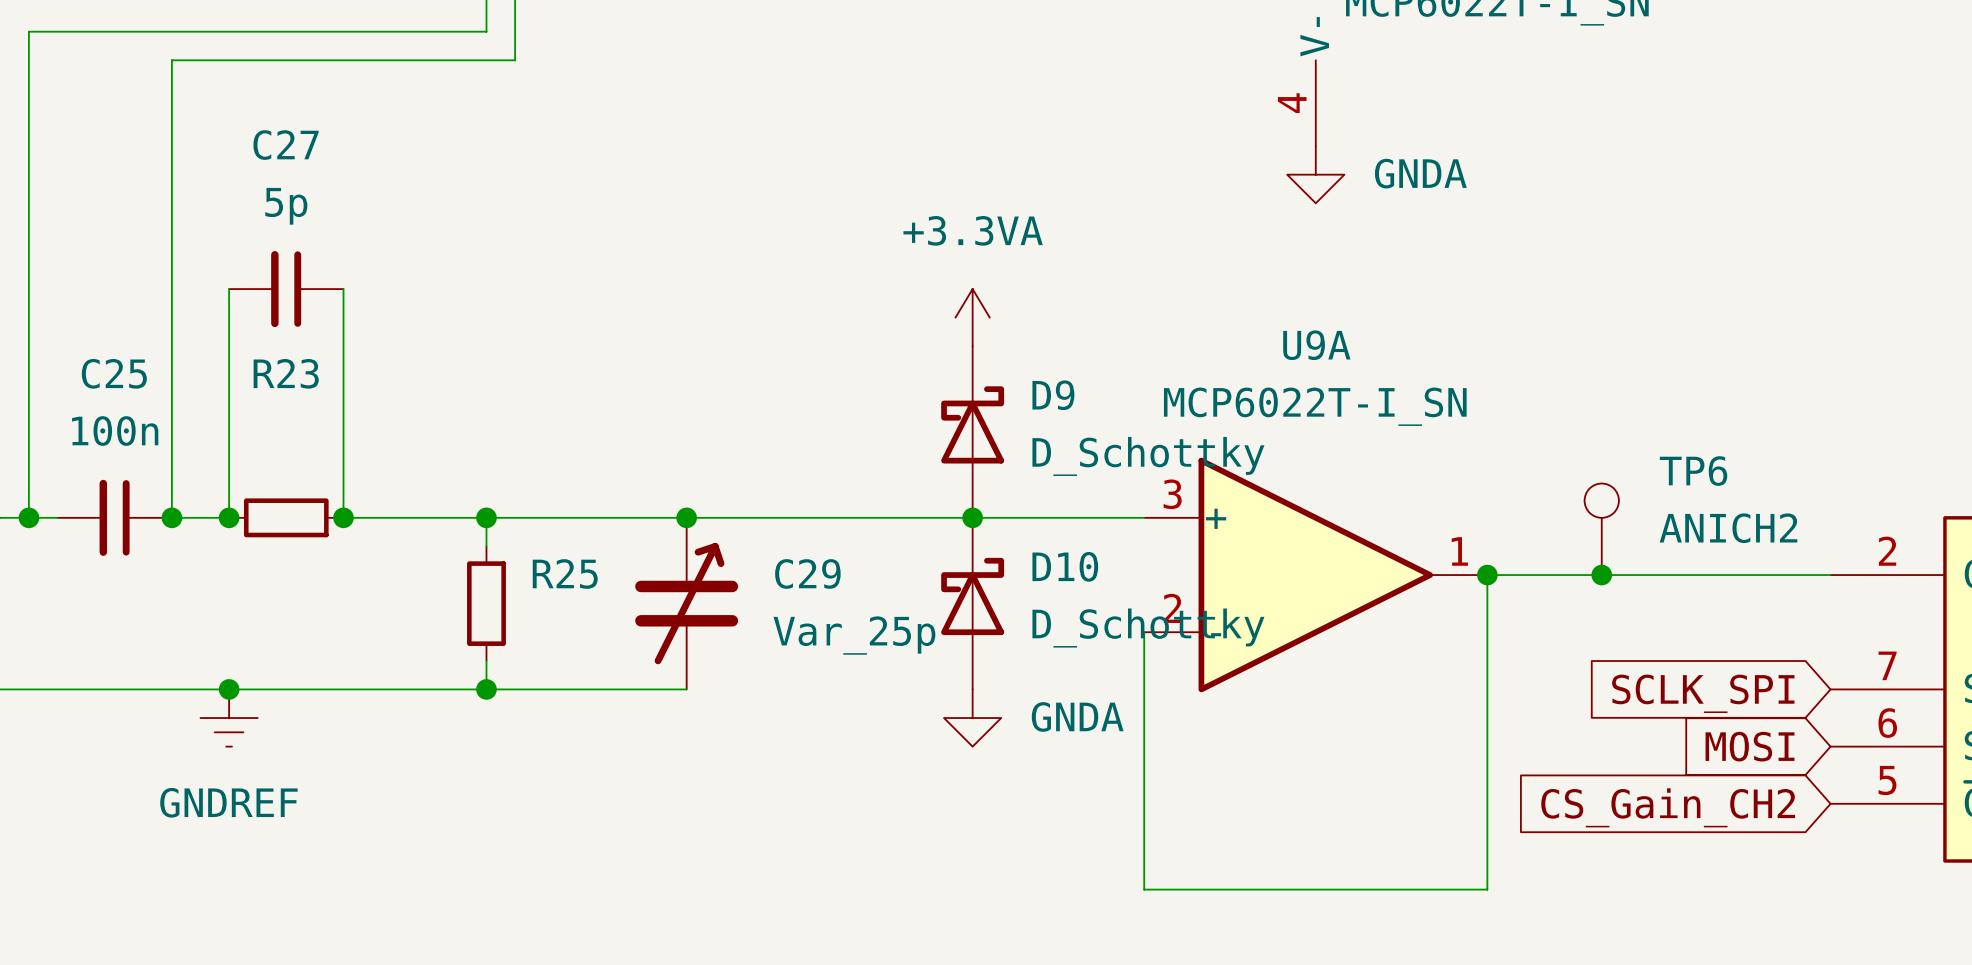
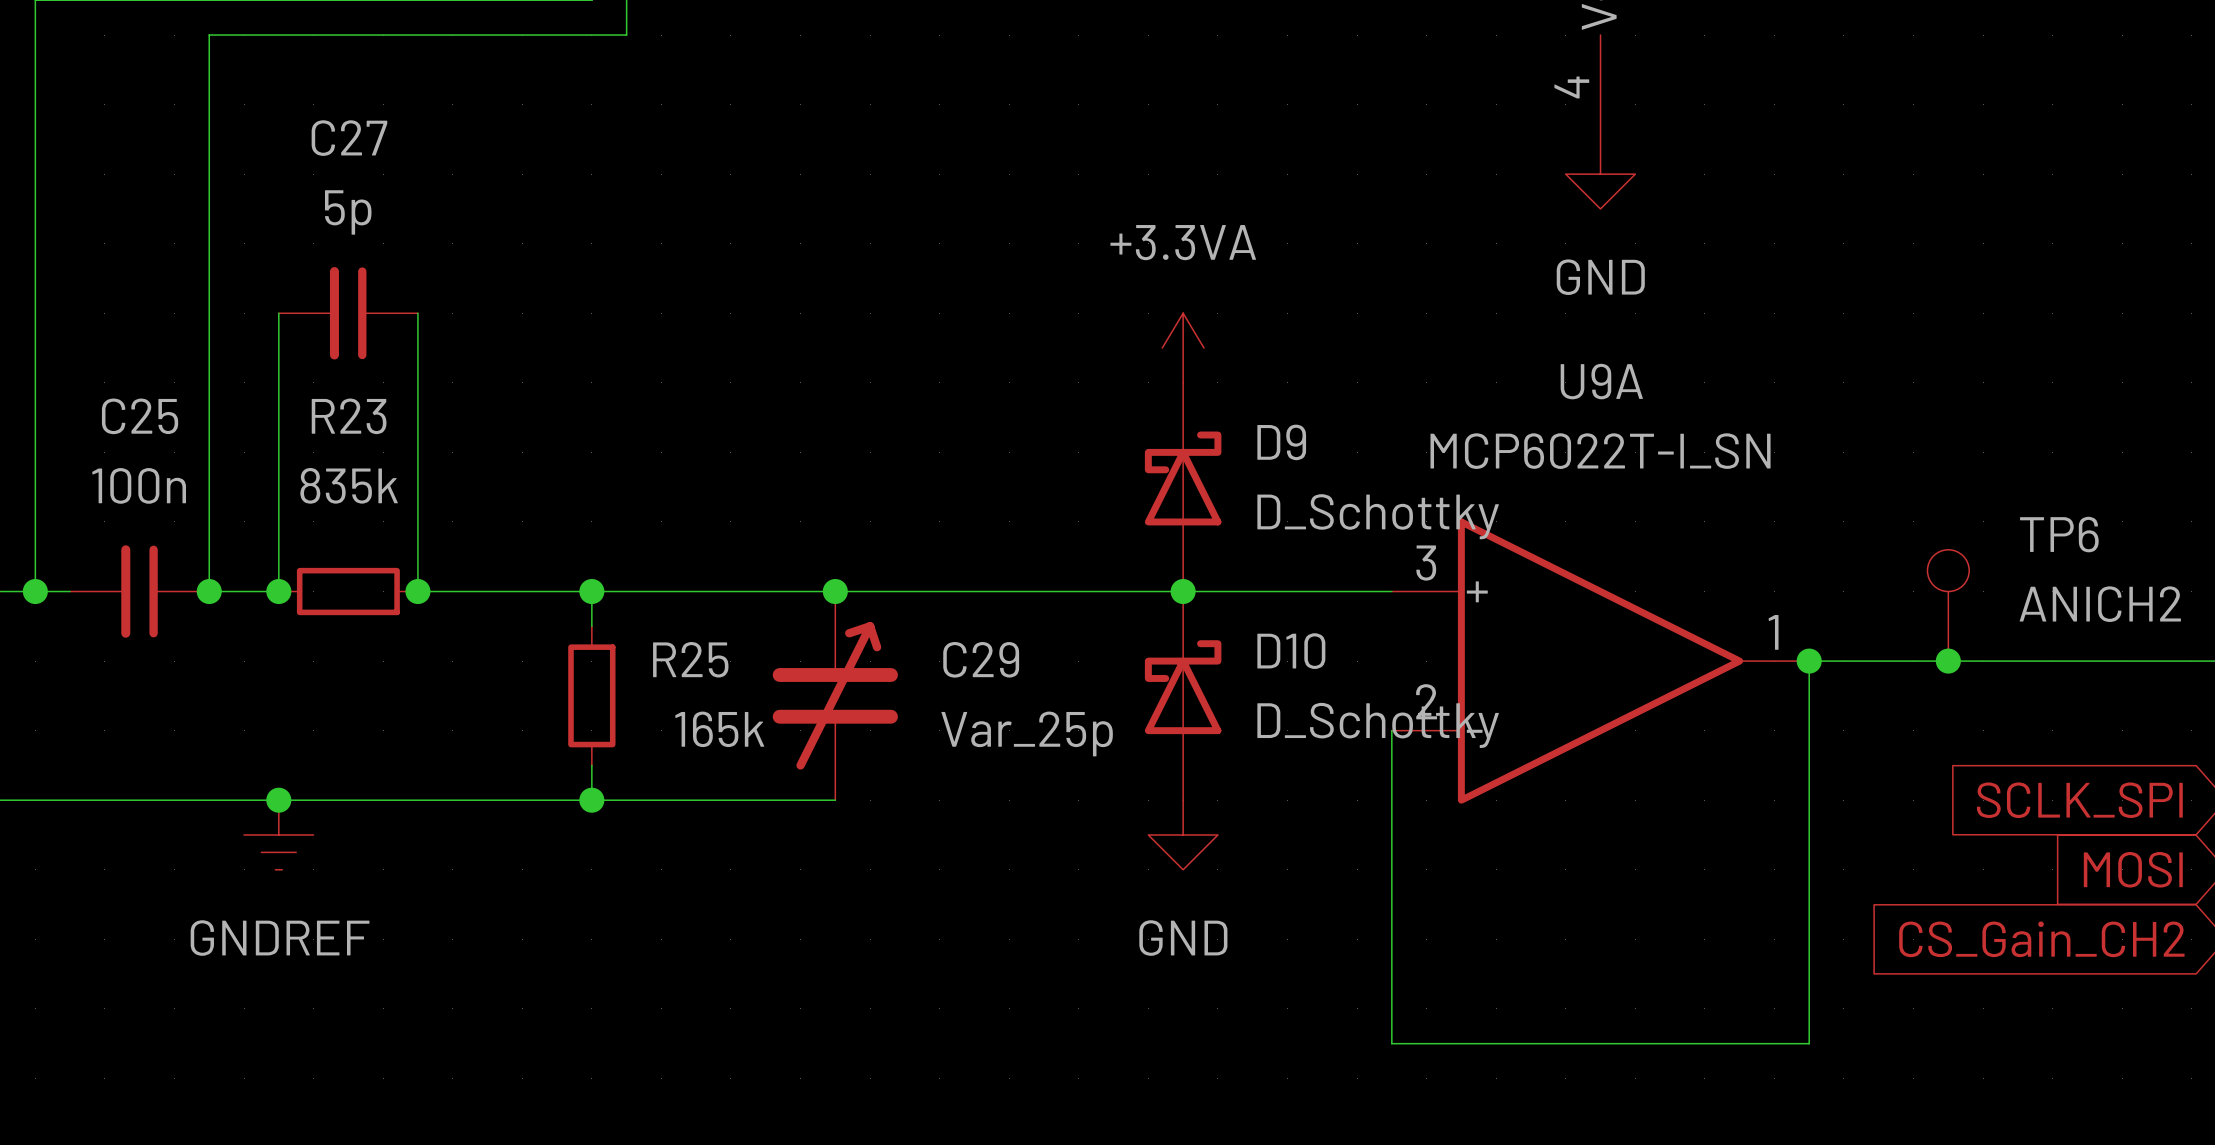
power symbol: GNDA (1315, 174) -> GND (1600, 174)
R23 value: none -> 835k (349, 485)
R25 value: none -> 165k (719, 729)
power symbol: GNDA (972, 718) -> GND (1183, 834)

